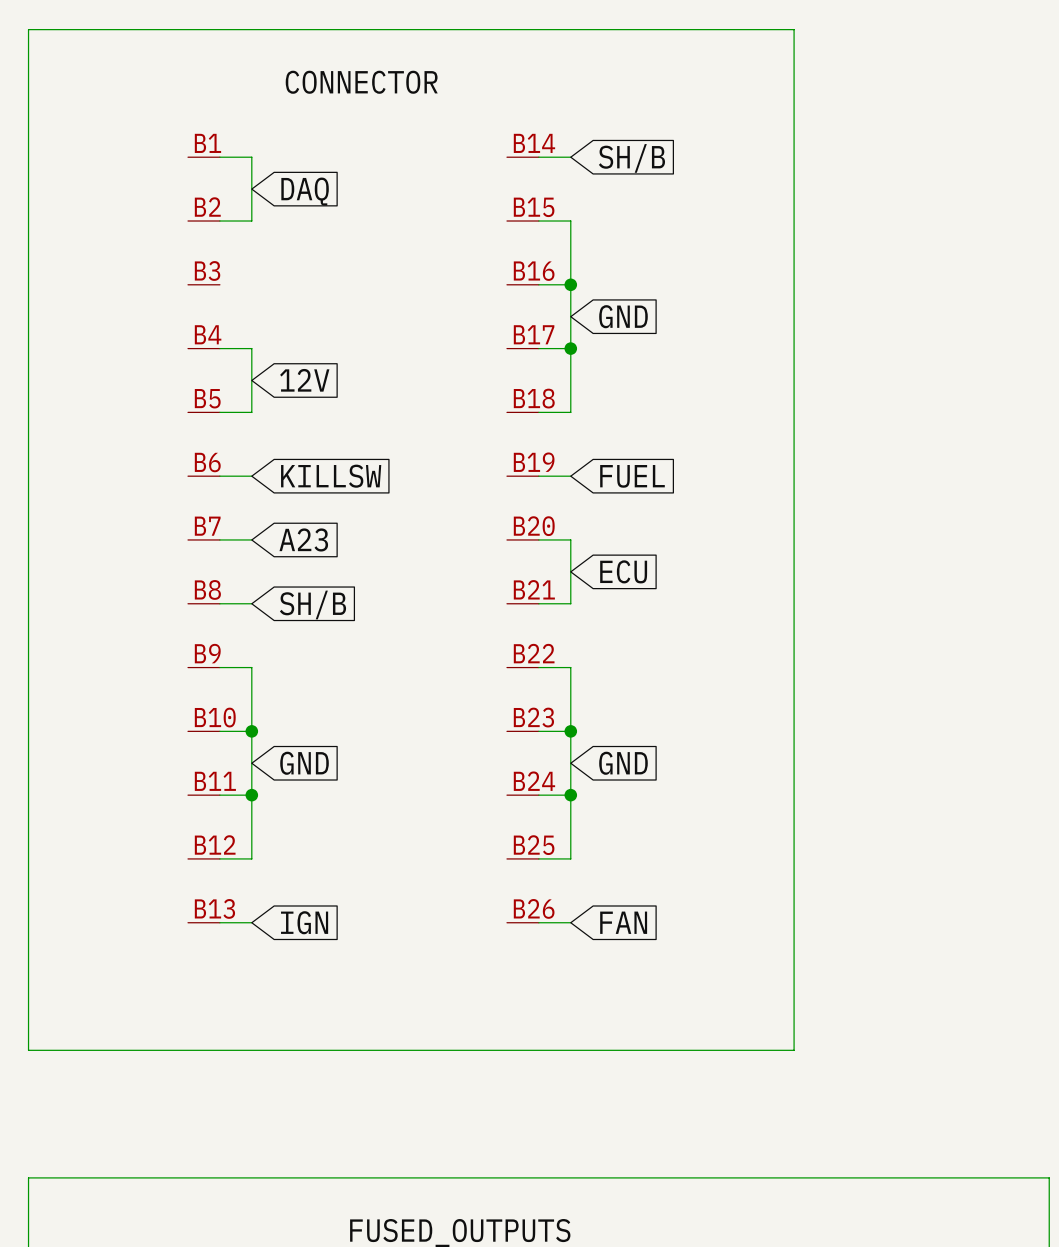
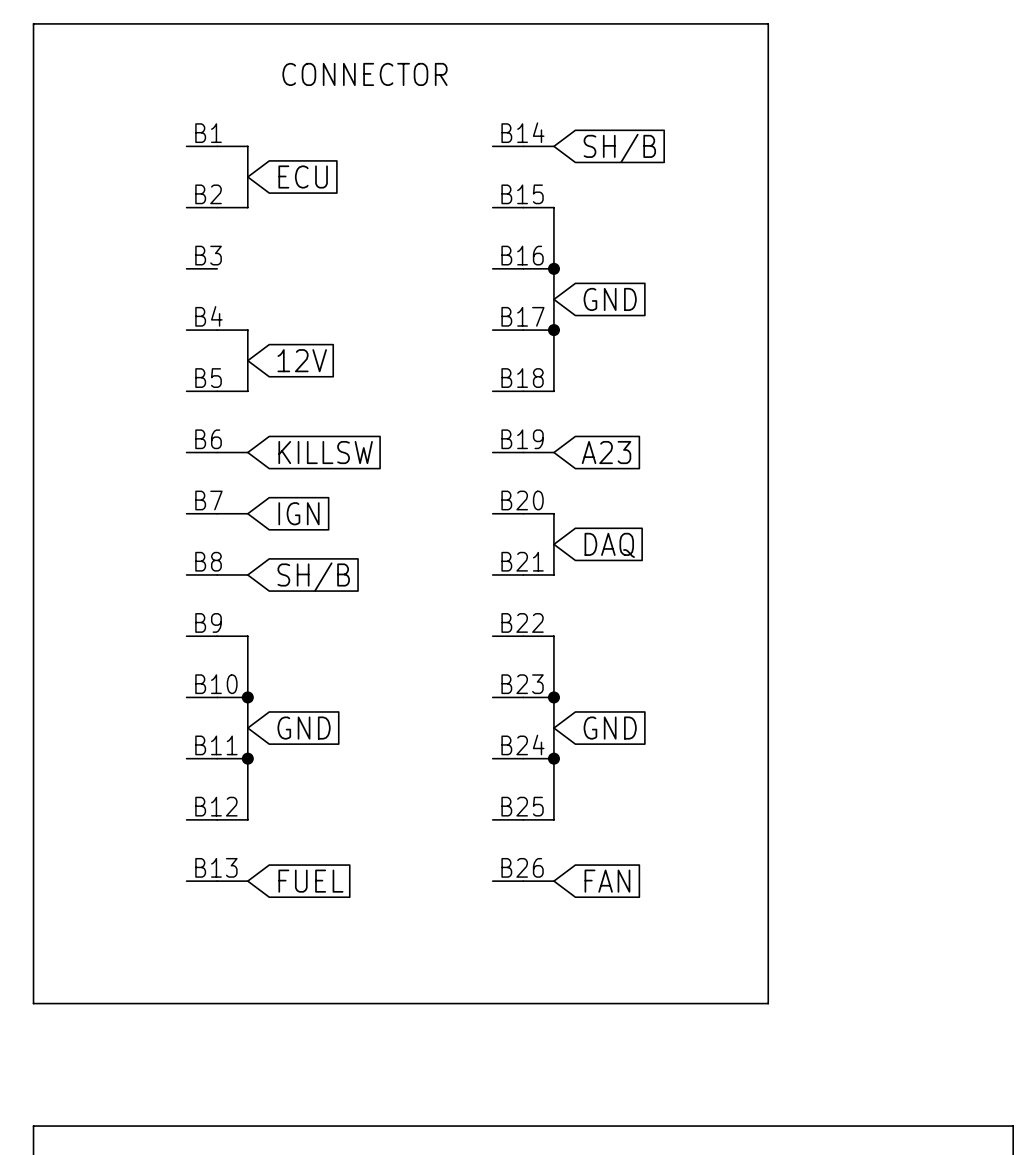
global label: DAQ (305, 191) -> ECU (303, 177)
global label: FUEL (632, 476) -> A23 (606, 452)
global label: A23 (303, 539) -> IGN (299, 513)
global label: ECU (623, 571) -> DAQ (609, 545)
global label: IGN (304, 922) -> FUEL (310, 881)

